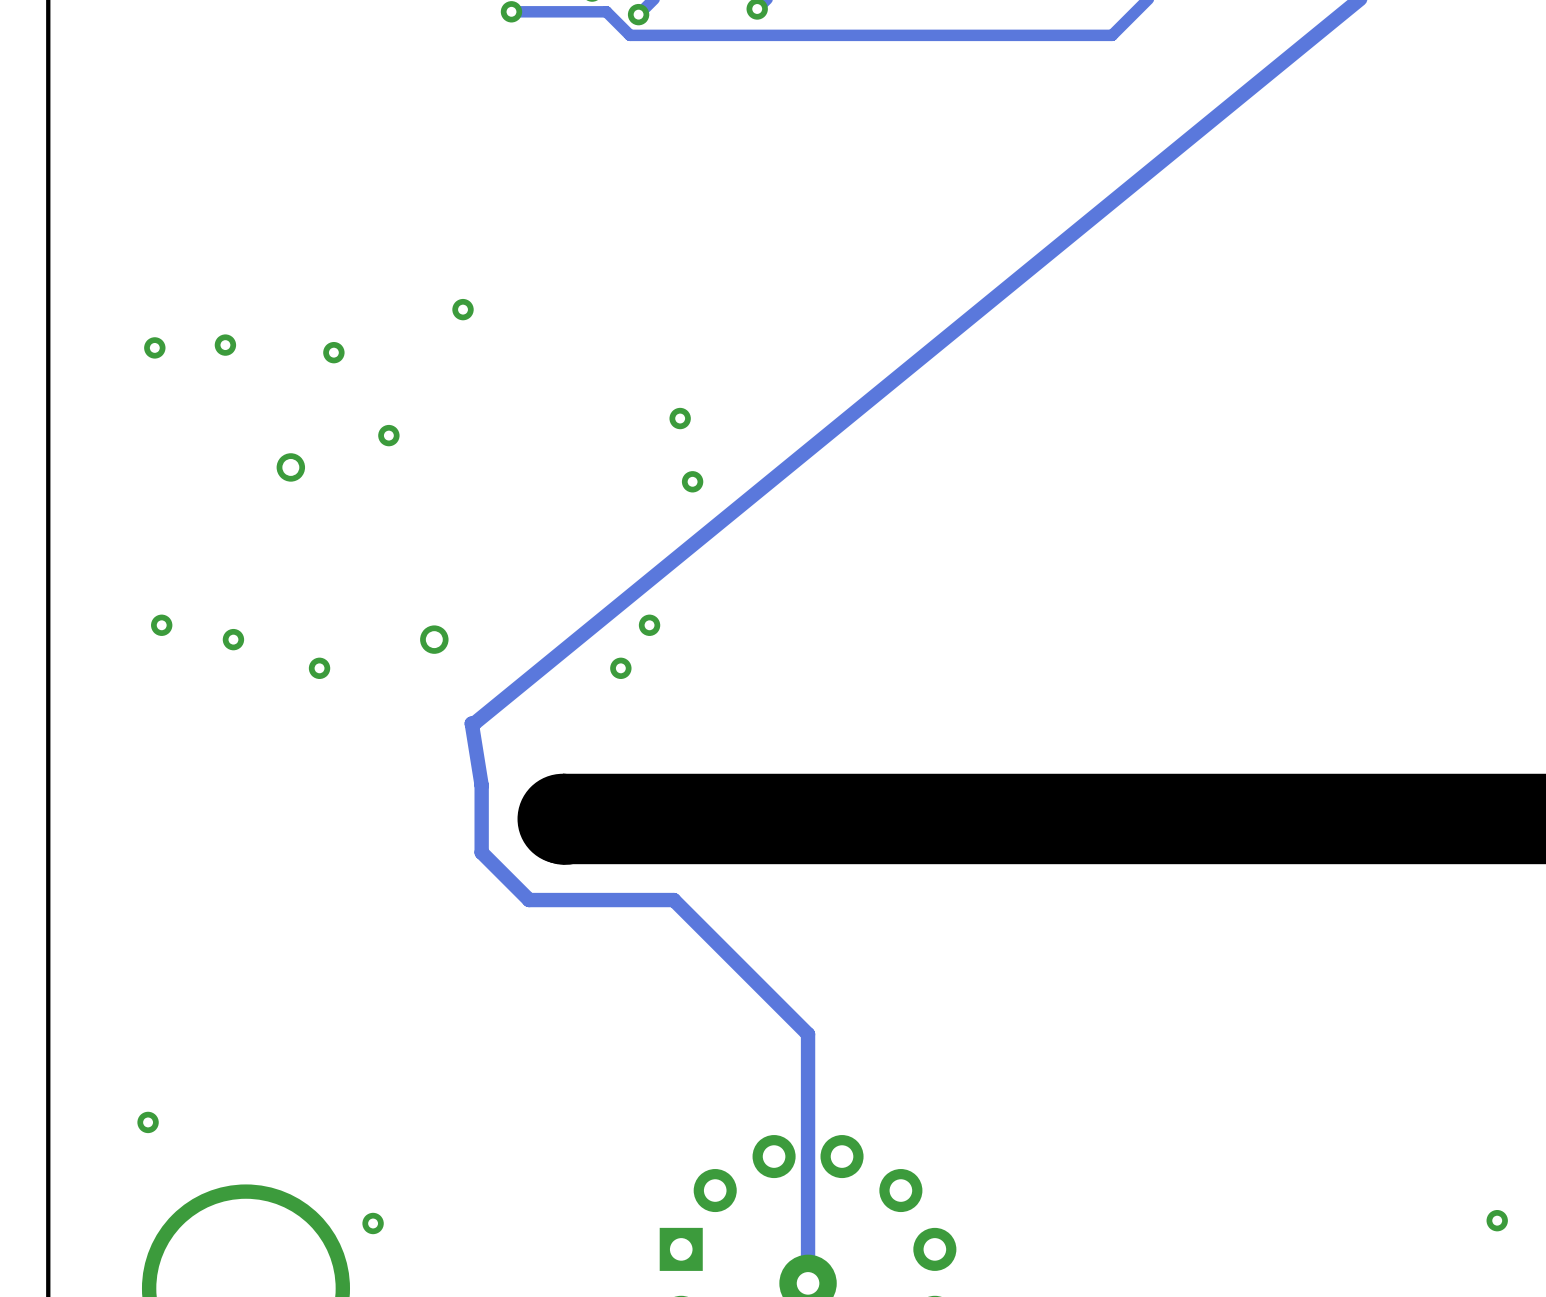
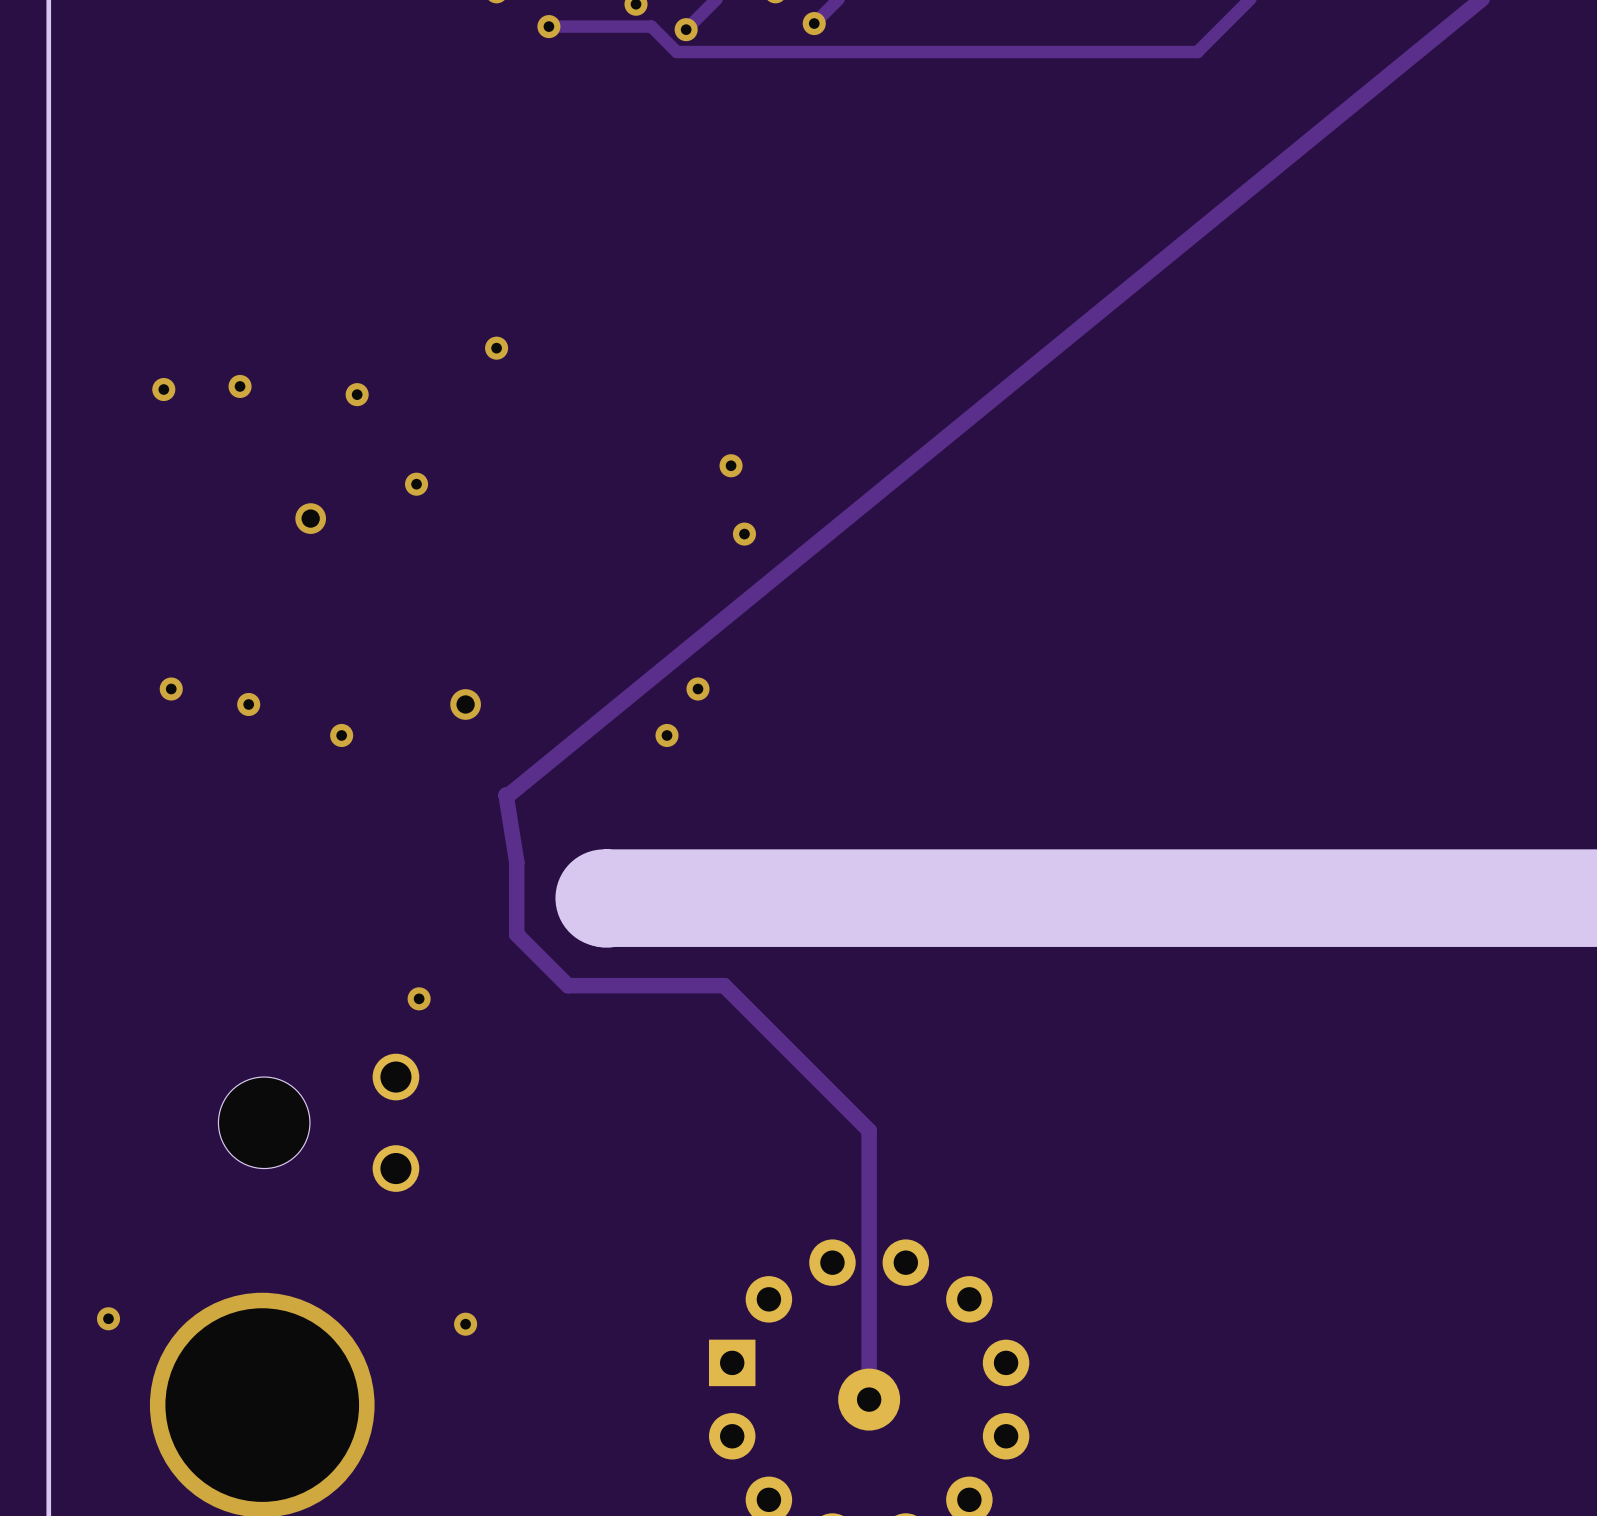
via: none -> (419, 998)
part: none -> (318, 1122)
via position: (148, 1122) -> (108, 1318)
via position: (373, 1223) -> (465, 1324)

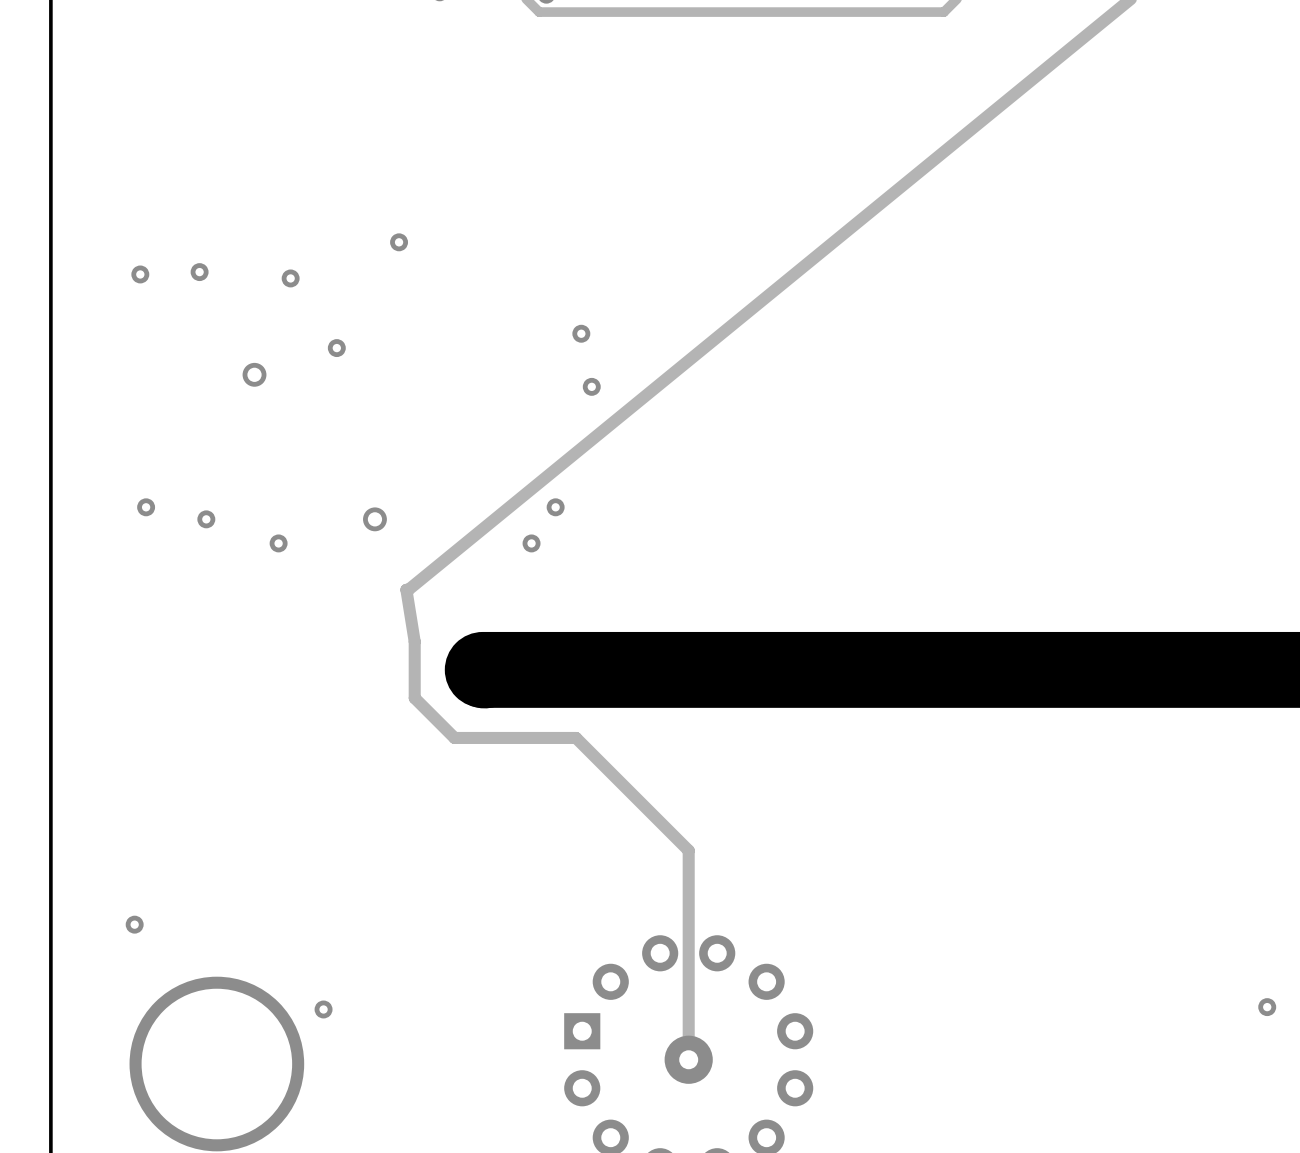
via: (419, 998) -> none
part: (318, 1122) -> none
via position: (108, 1318) -> (134, 924)
via position: (465, 1324) -> (323, 1009)

